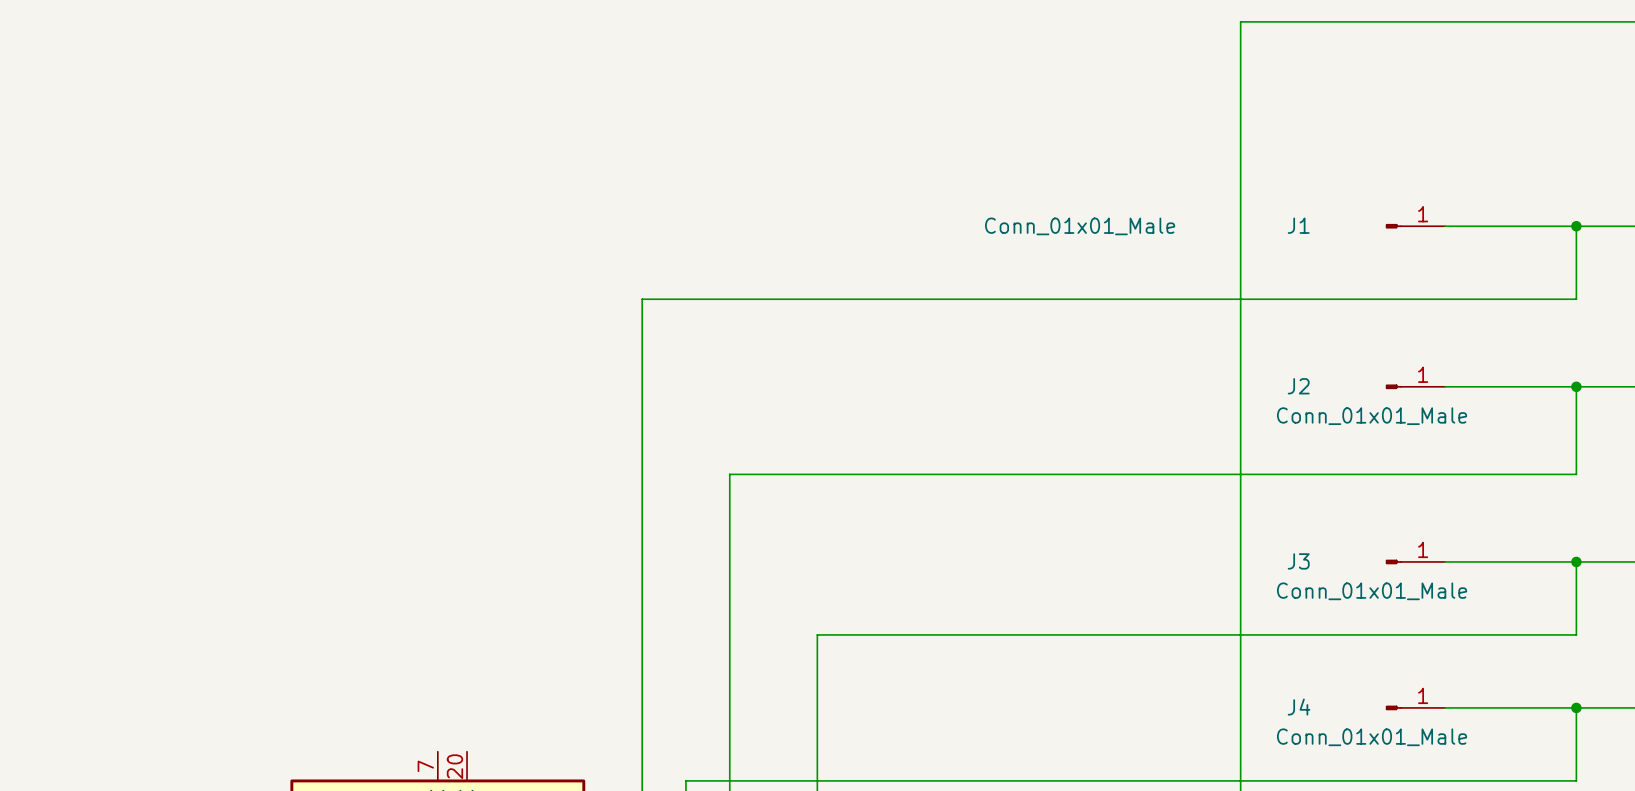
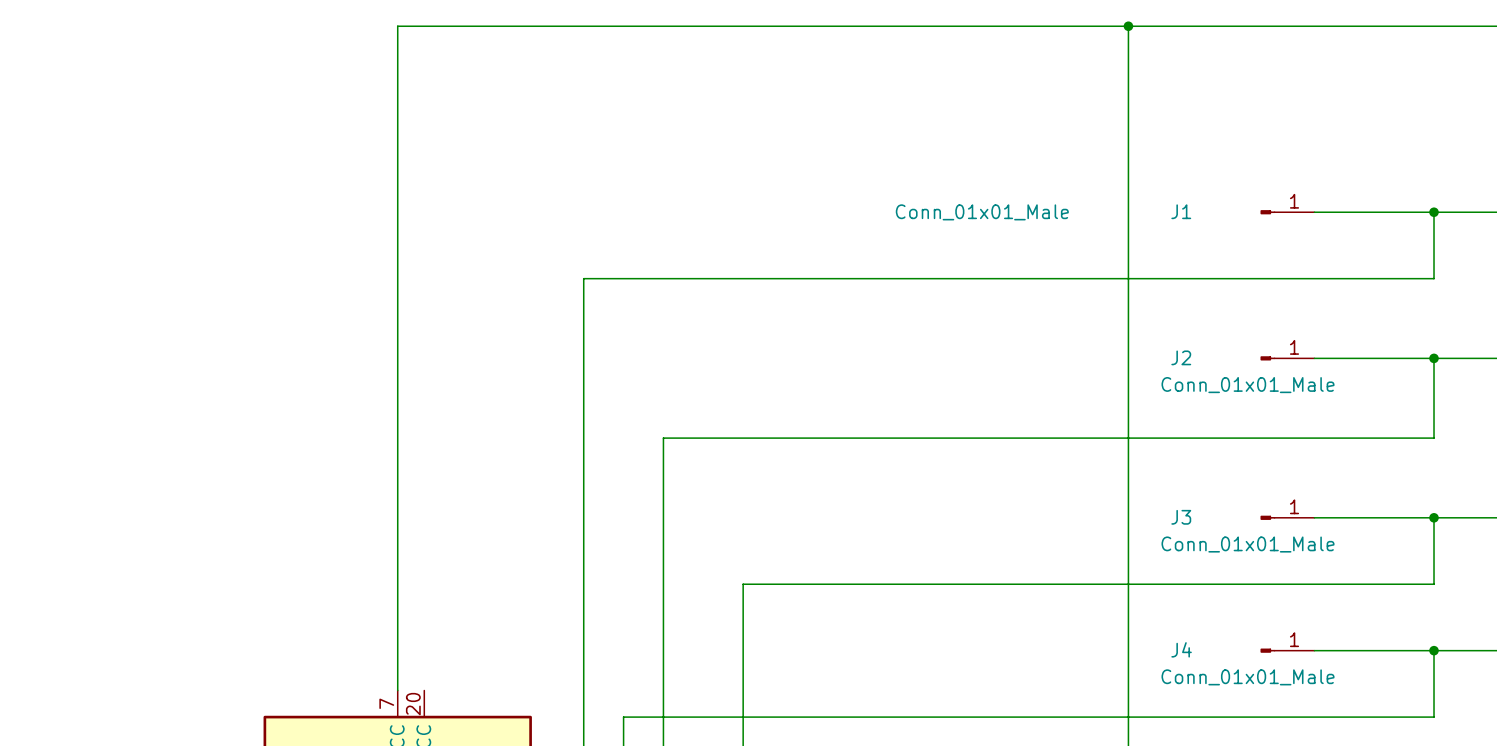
wire: none -> (1128, 26) (397, 26) (397, 690)
junction: none -> (1128, 26)

